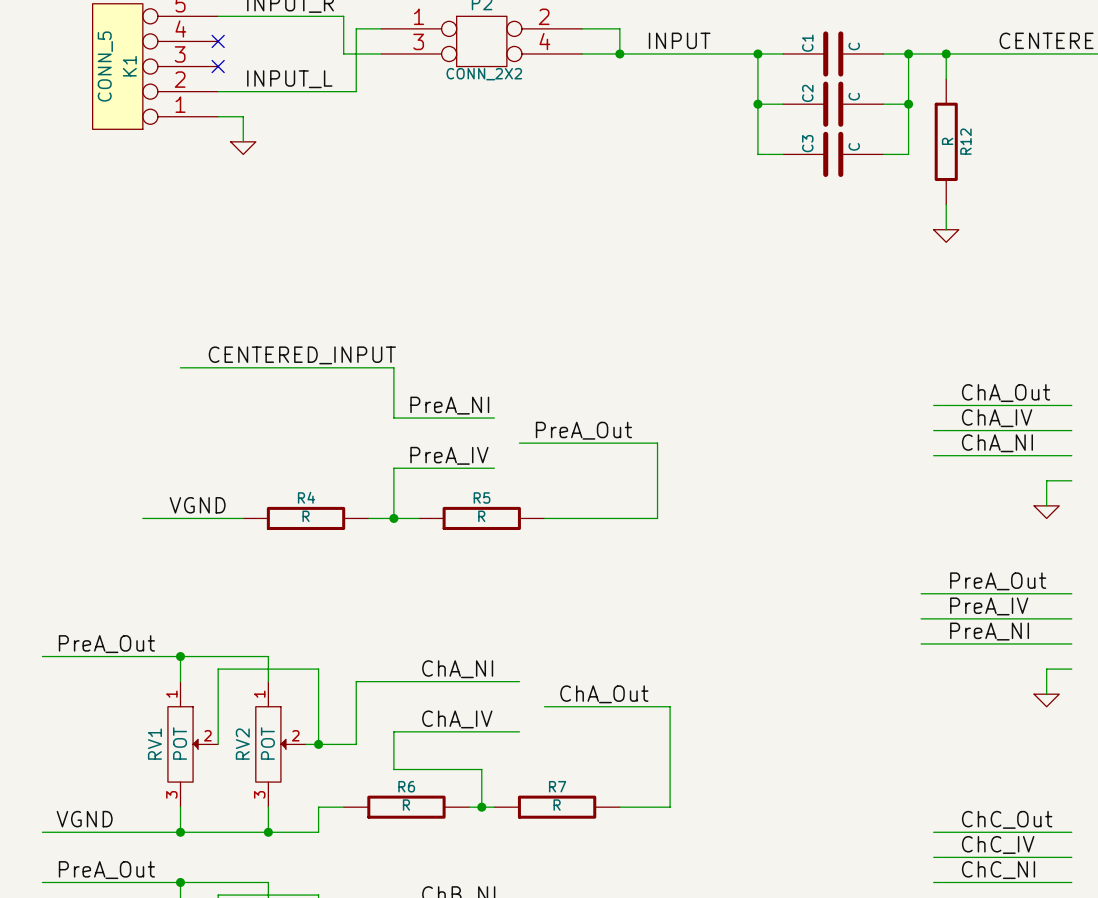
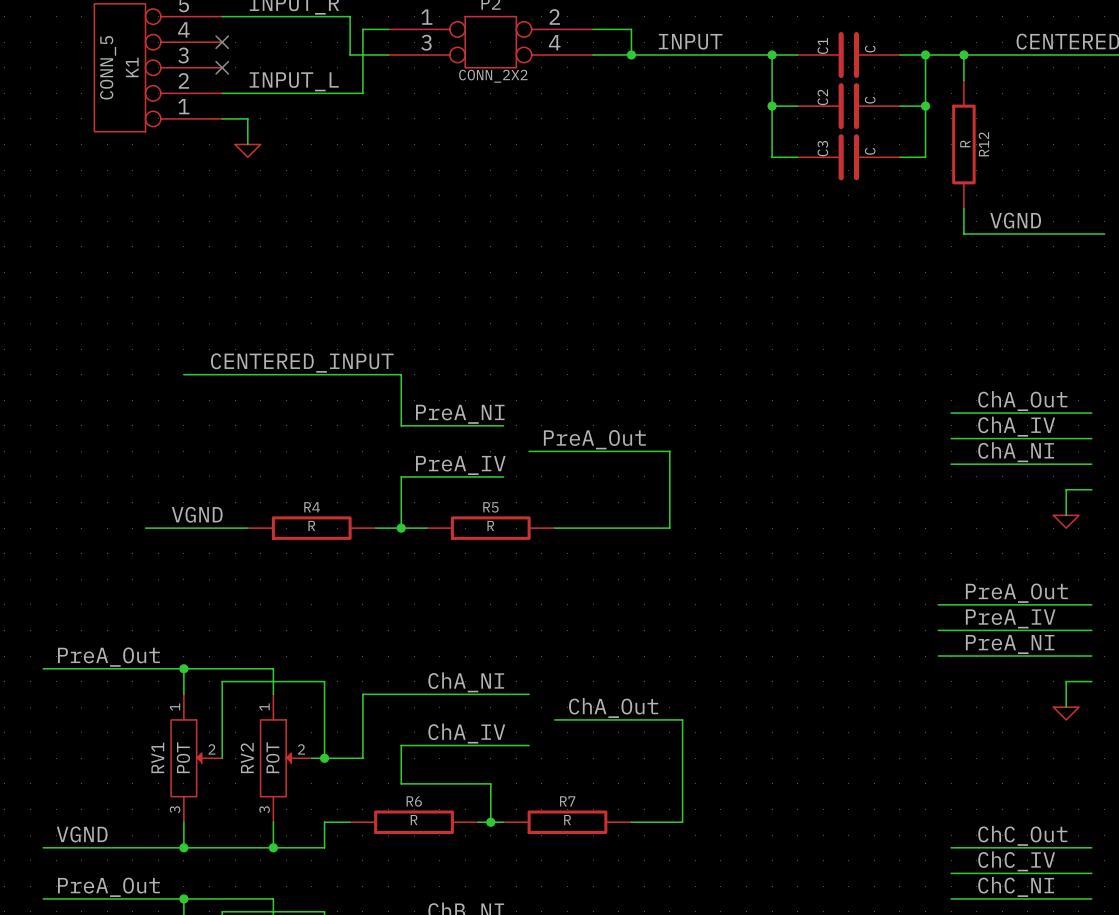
label: none -> VGND (1015, 220)
wire: none -> (963, 234) (1104, 234)
power symbol: (946, 236) -> none

